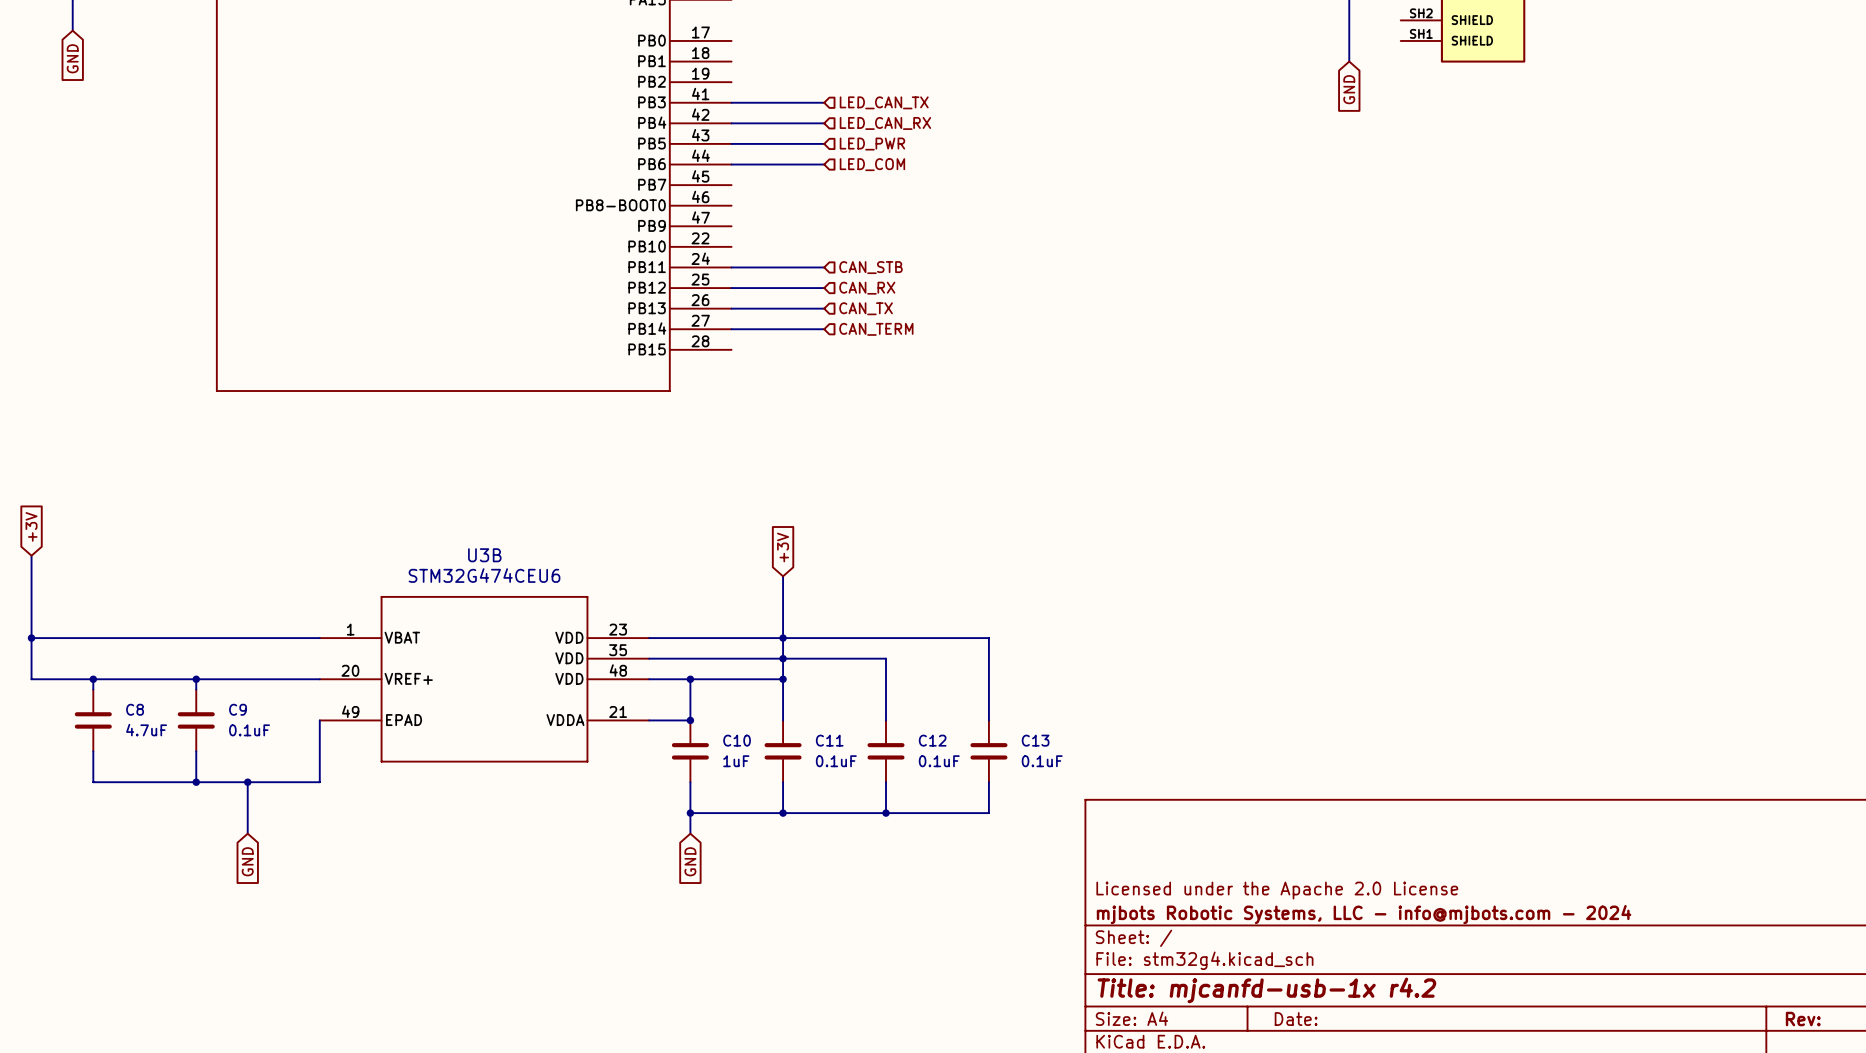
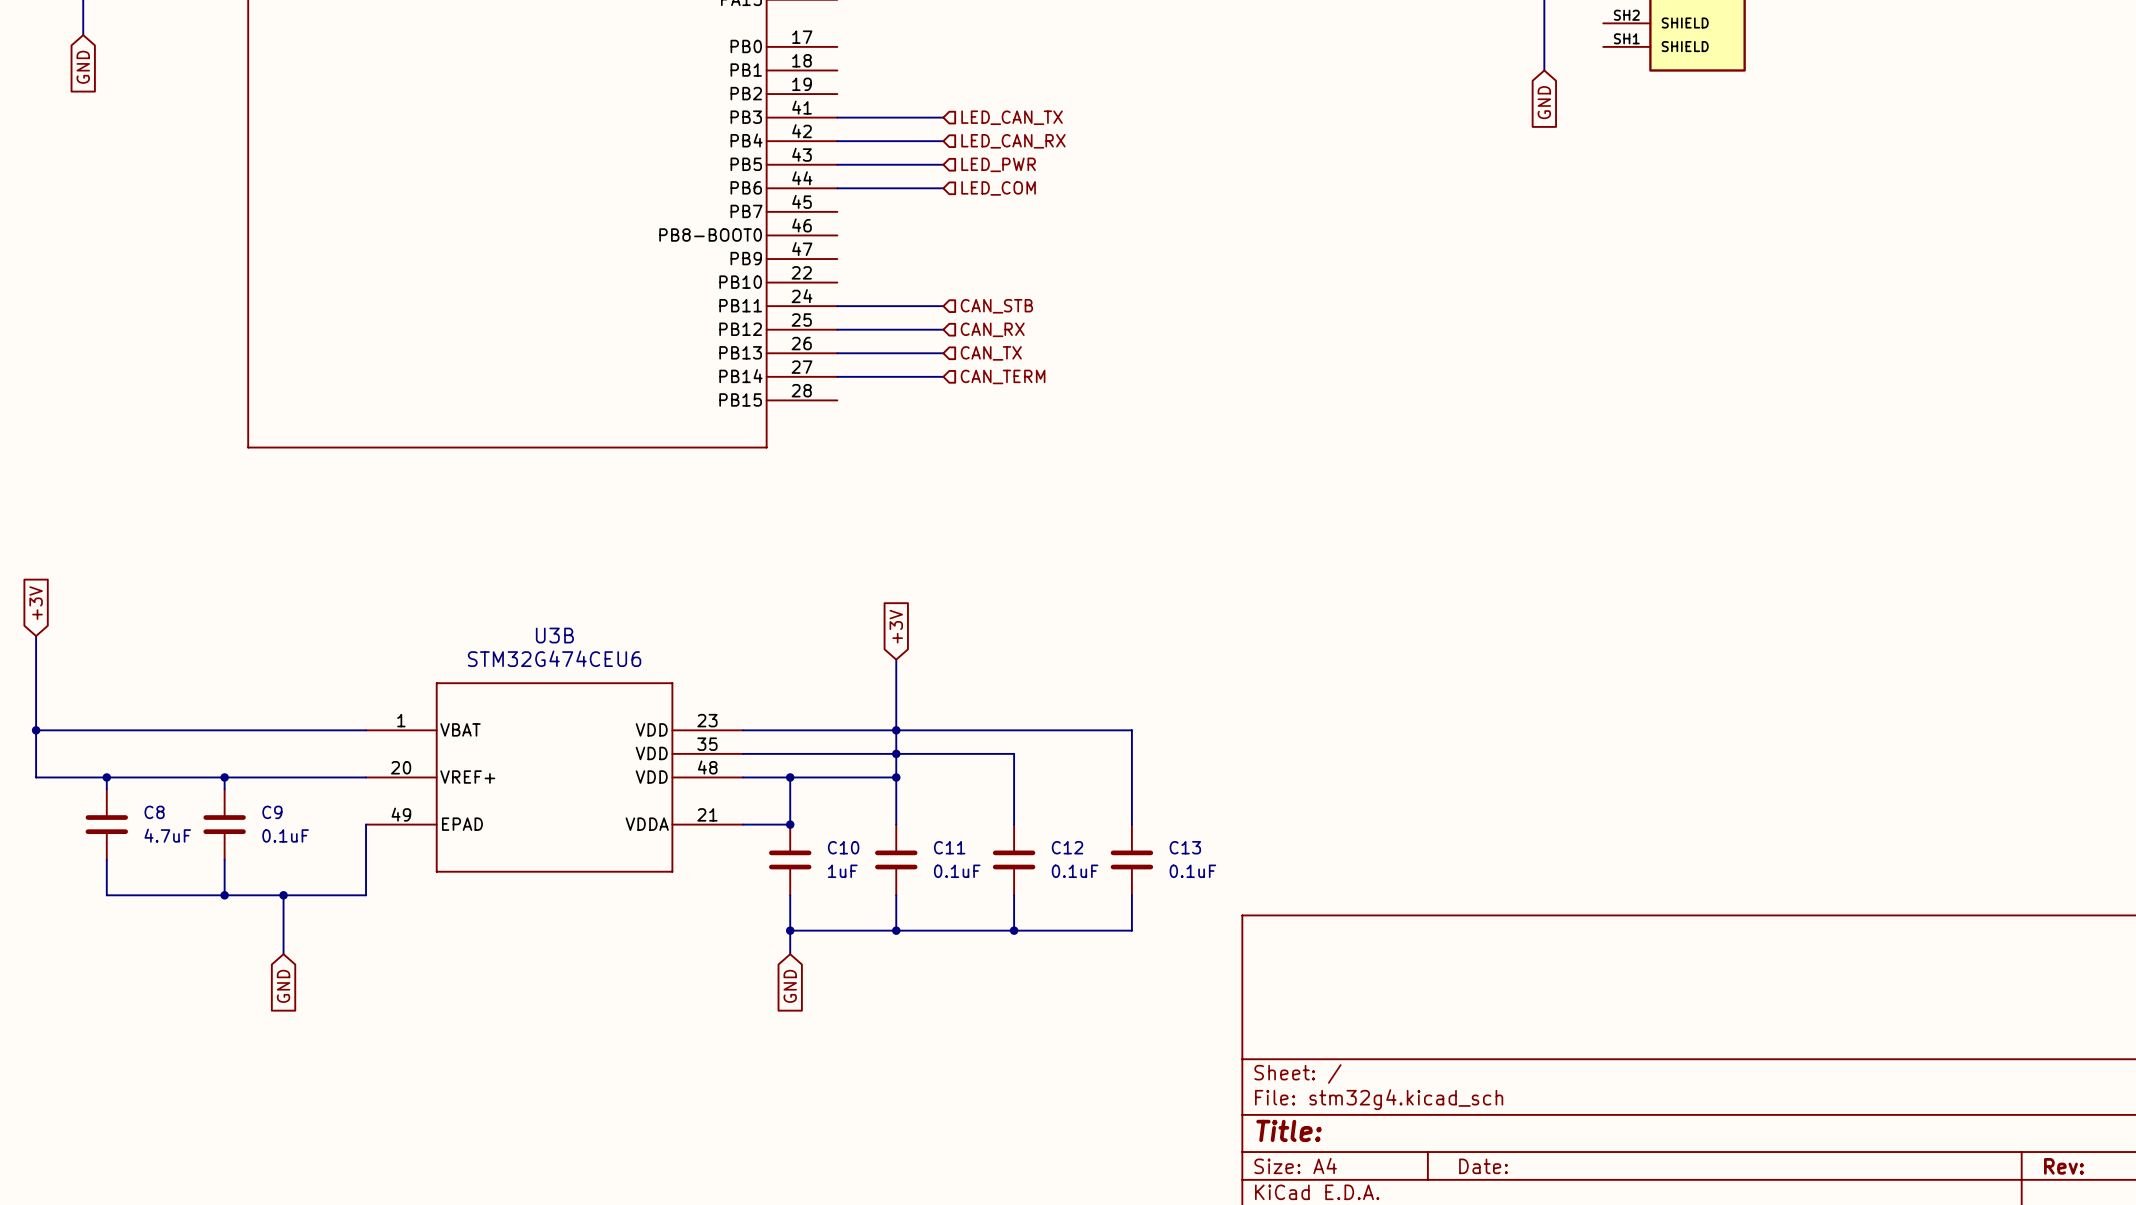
title block: Licensed under the Apache 2.0 License (1277, 890) -> none
title block: mjbots Robotic Systems, LLC - info@mjbots.com - 2024 (1364, 914) -> none
title block: Title: mjcanfd-usb-1x r4.2 (1266, 990) -> Title: (1289, 1130)

